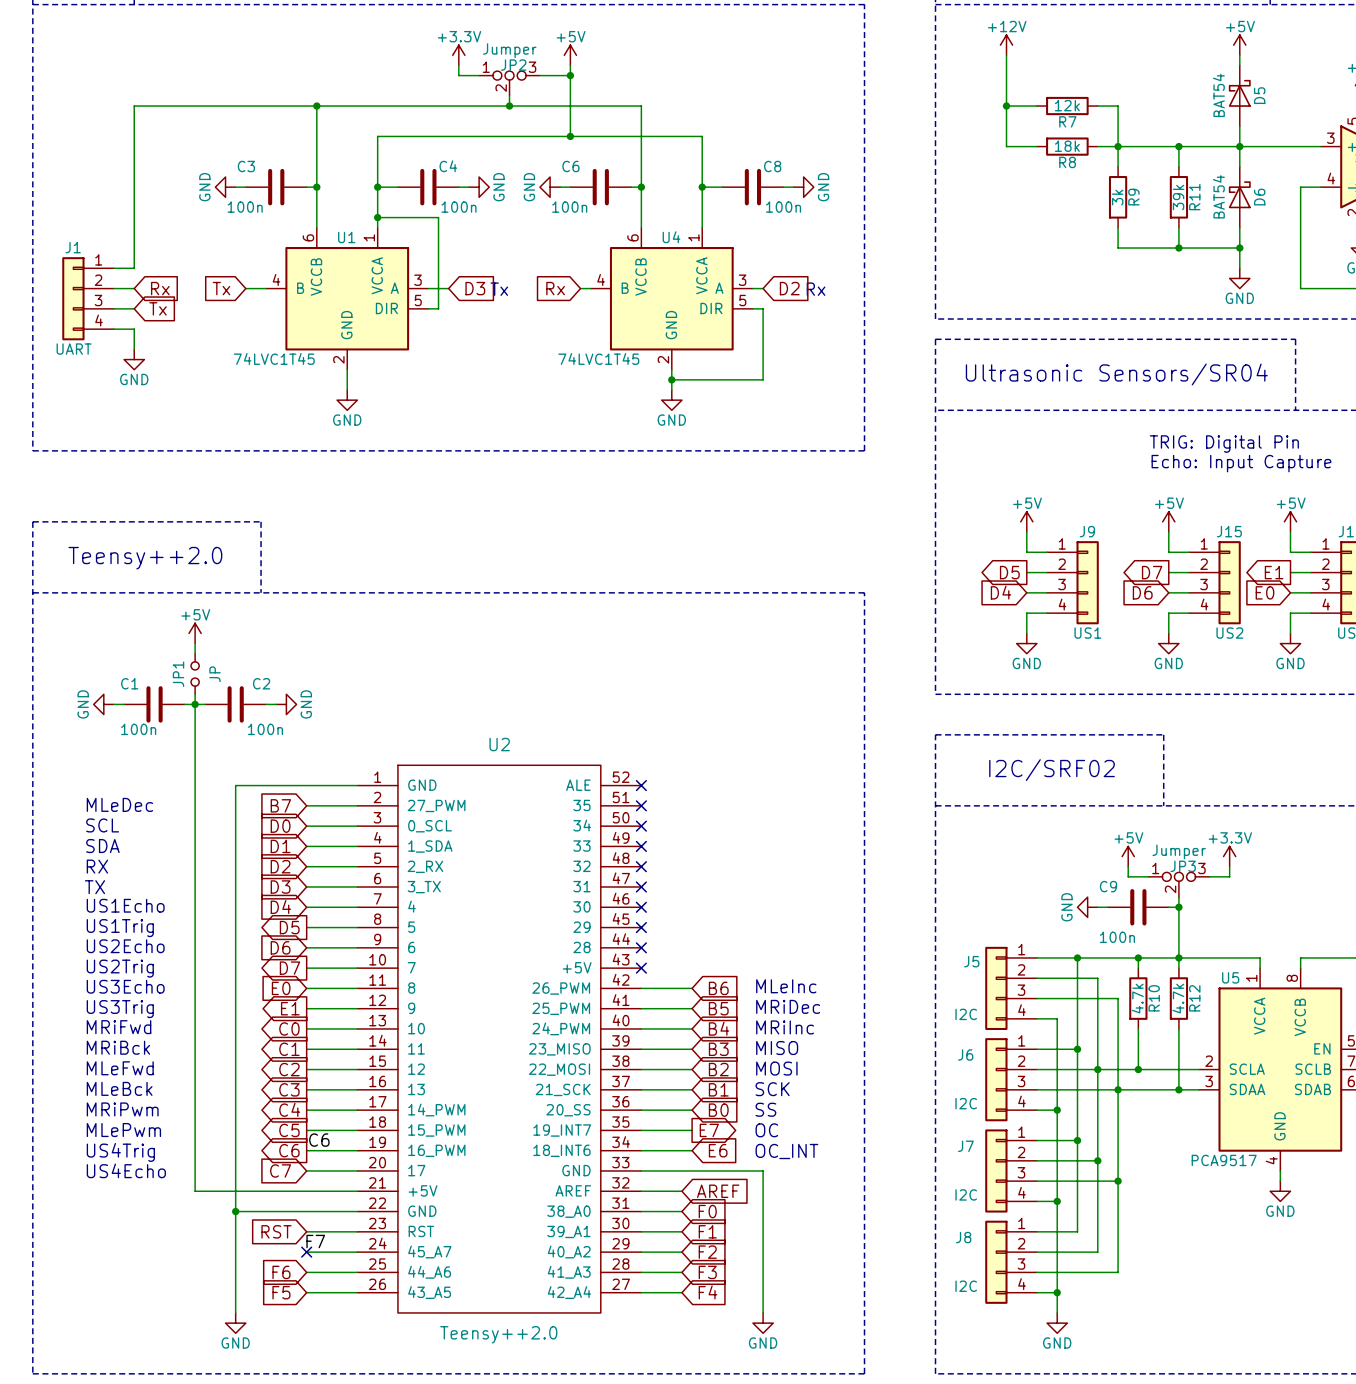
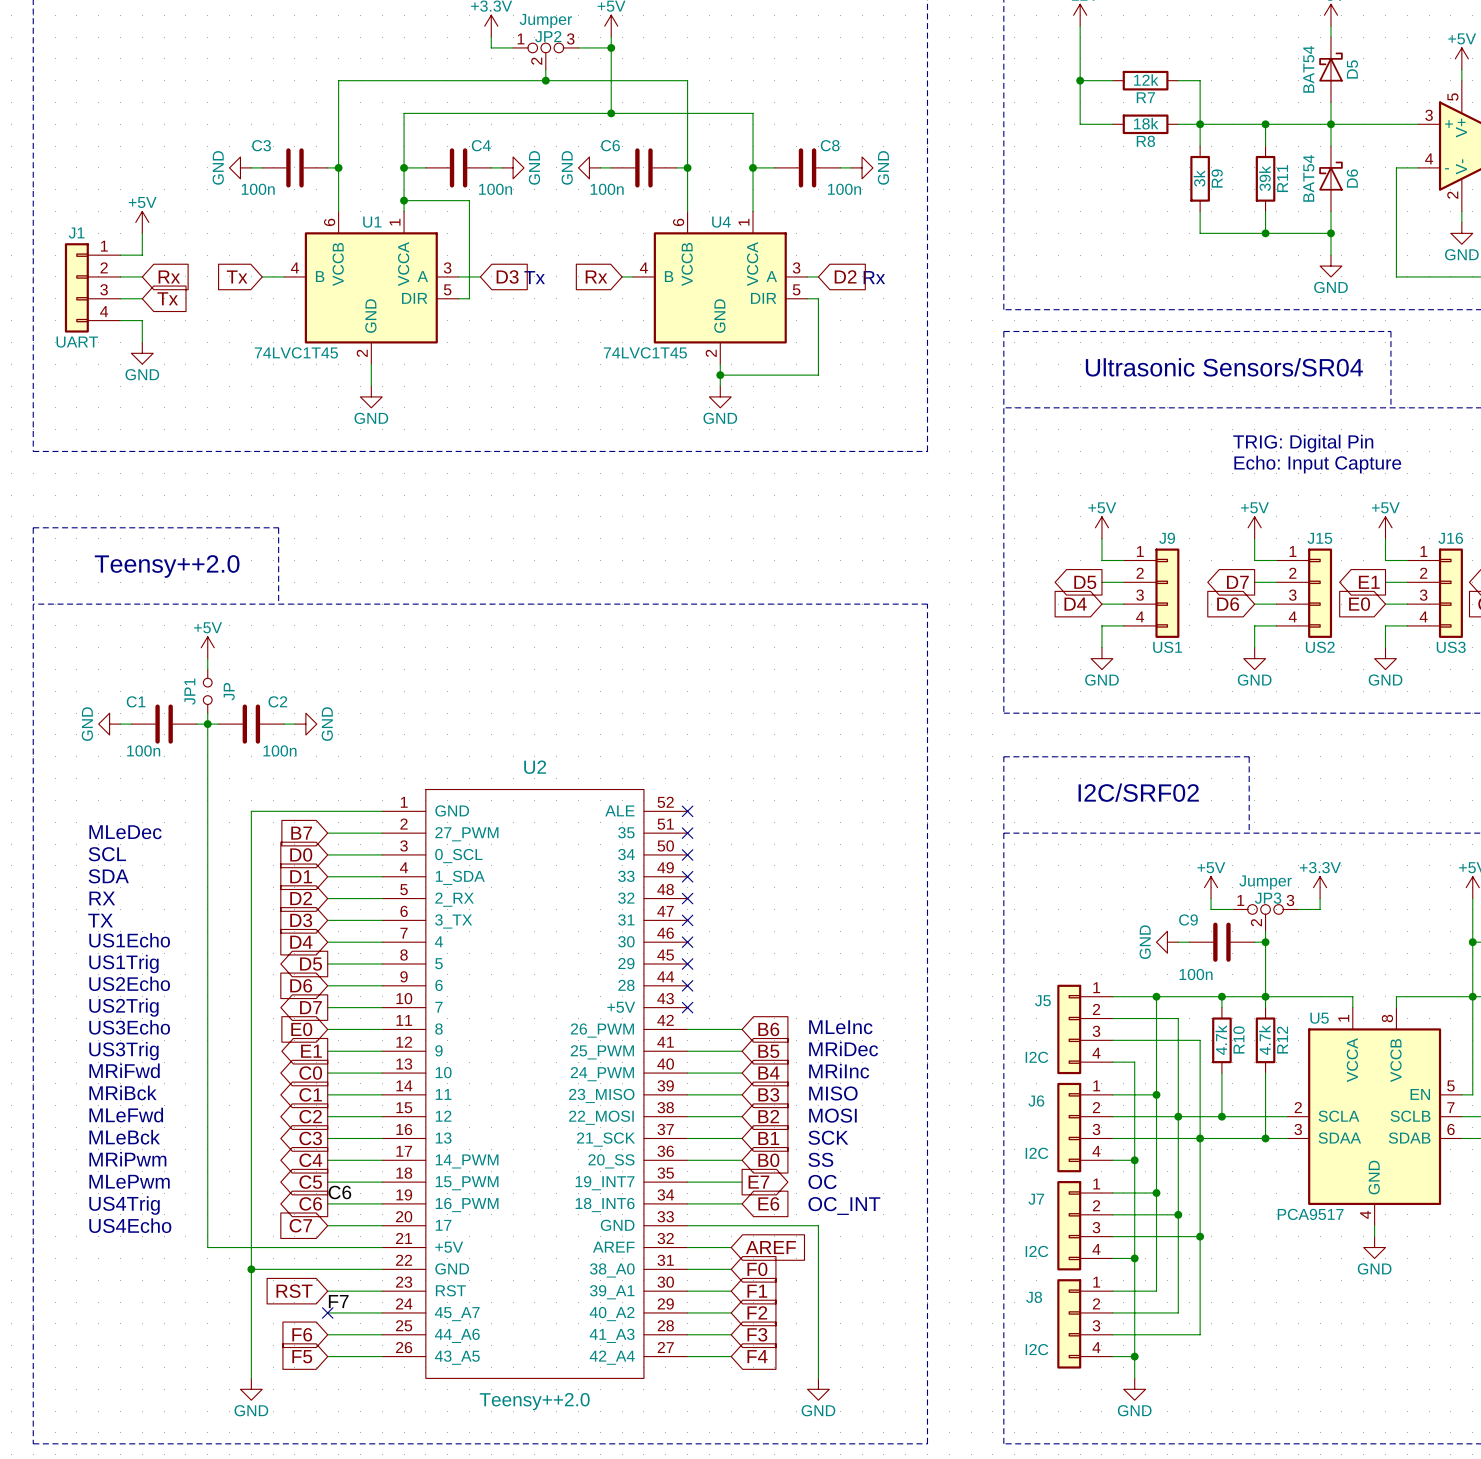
wire: (316, 106) (134, 106) (134, 248) -> none
junction: (316, 106) -> none
power symbol: none -> +5V (142, 222)

